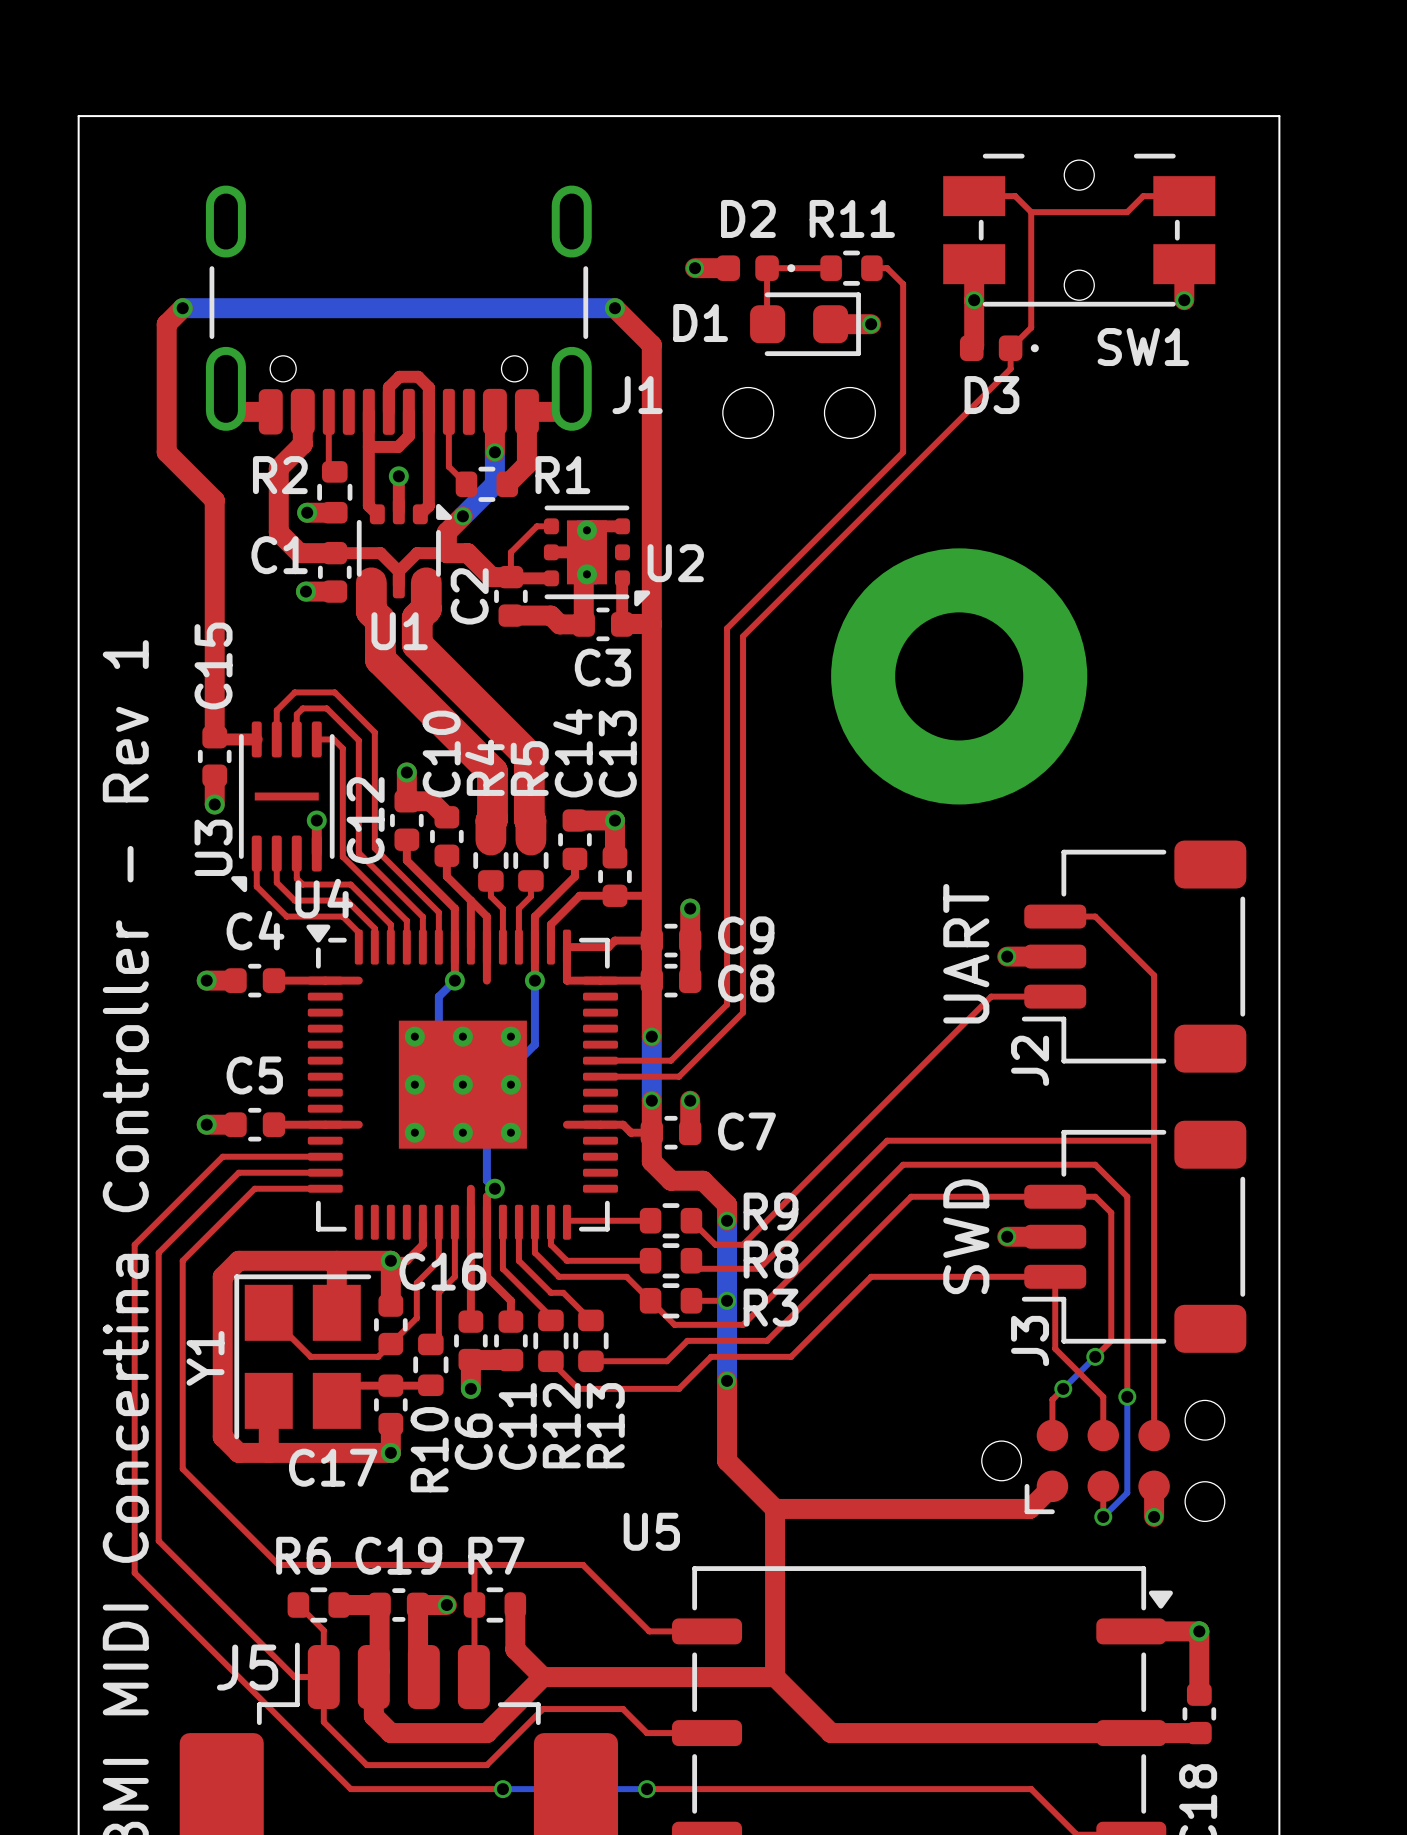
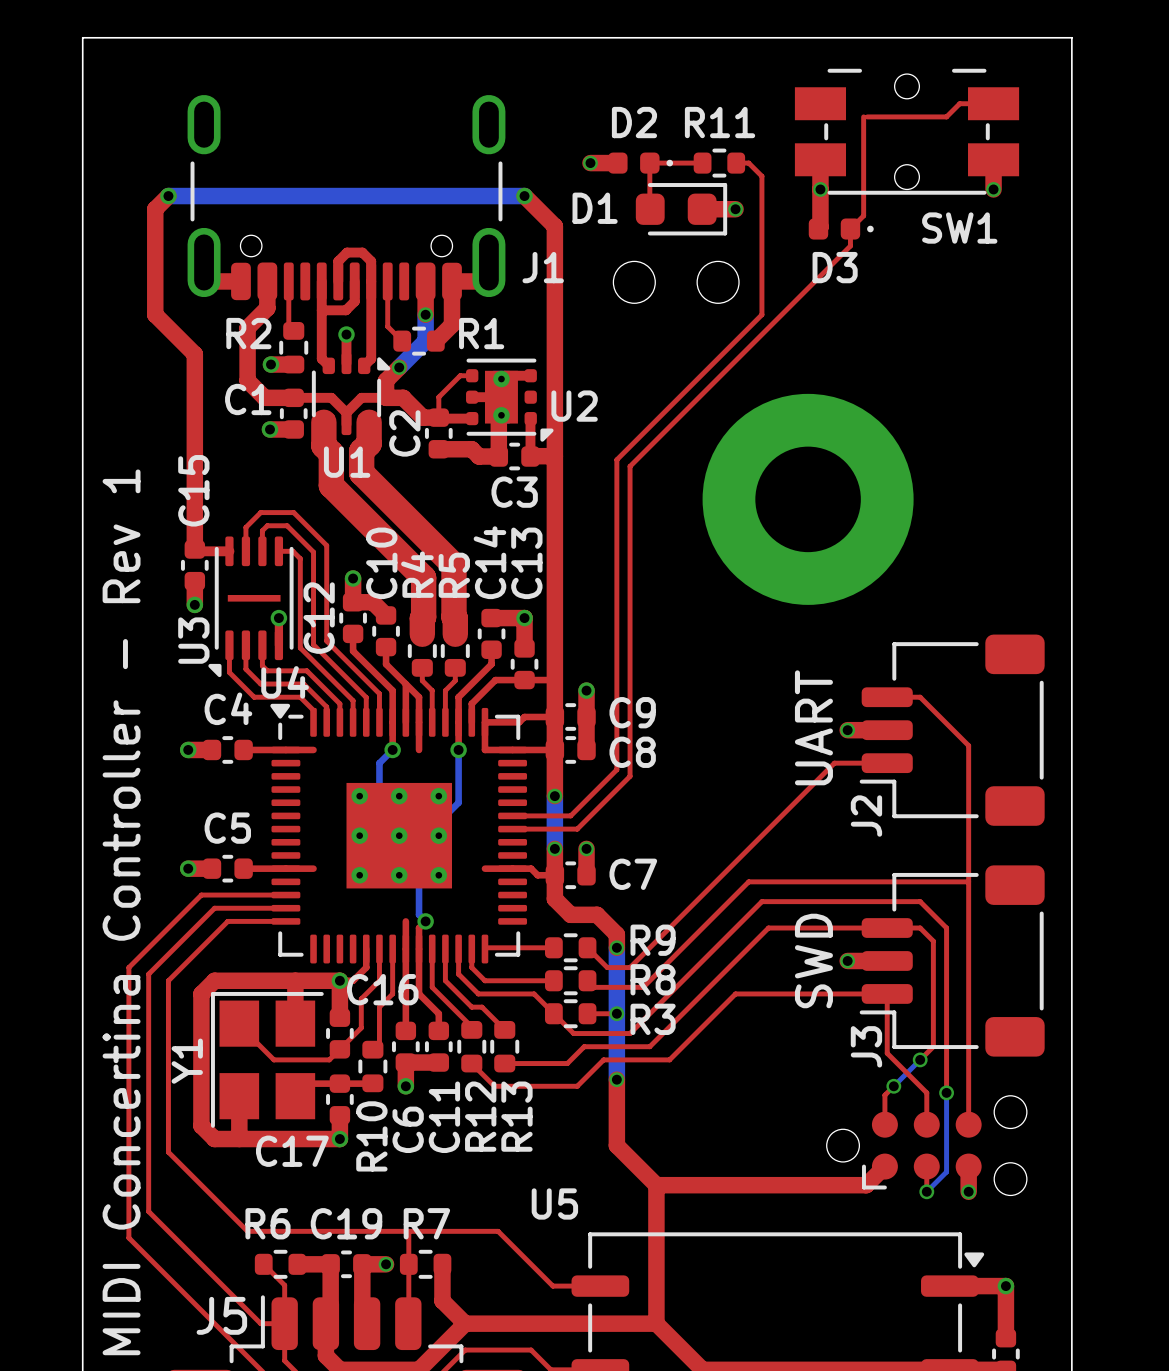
top track: (974, 196) (1015, 196) (1031, 212) (1031, 327) (1026, 332) -> (863, 116) (863, 215)

